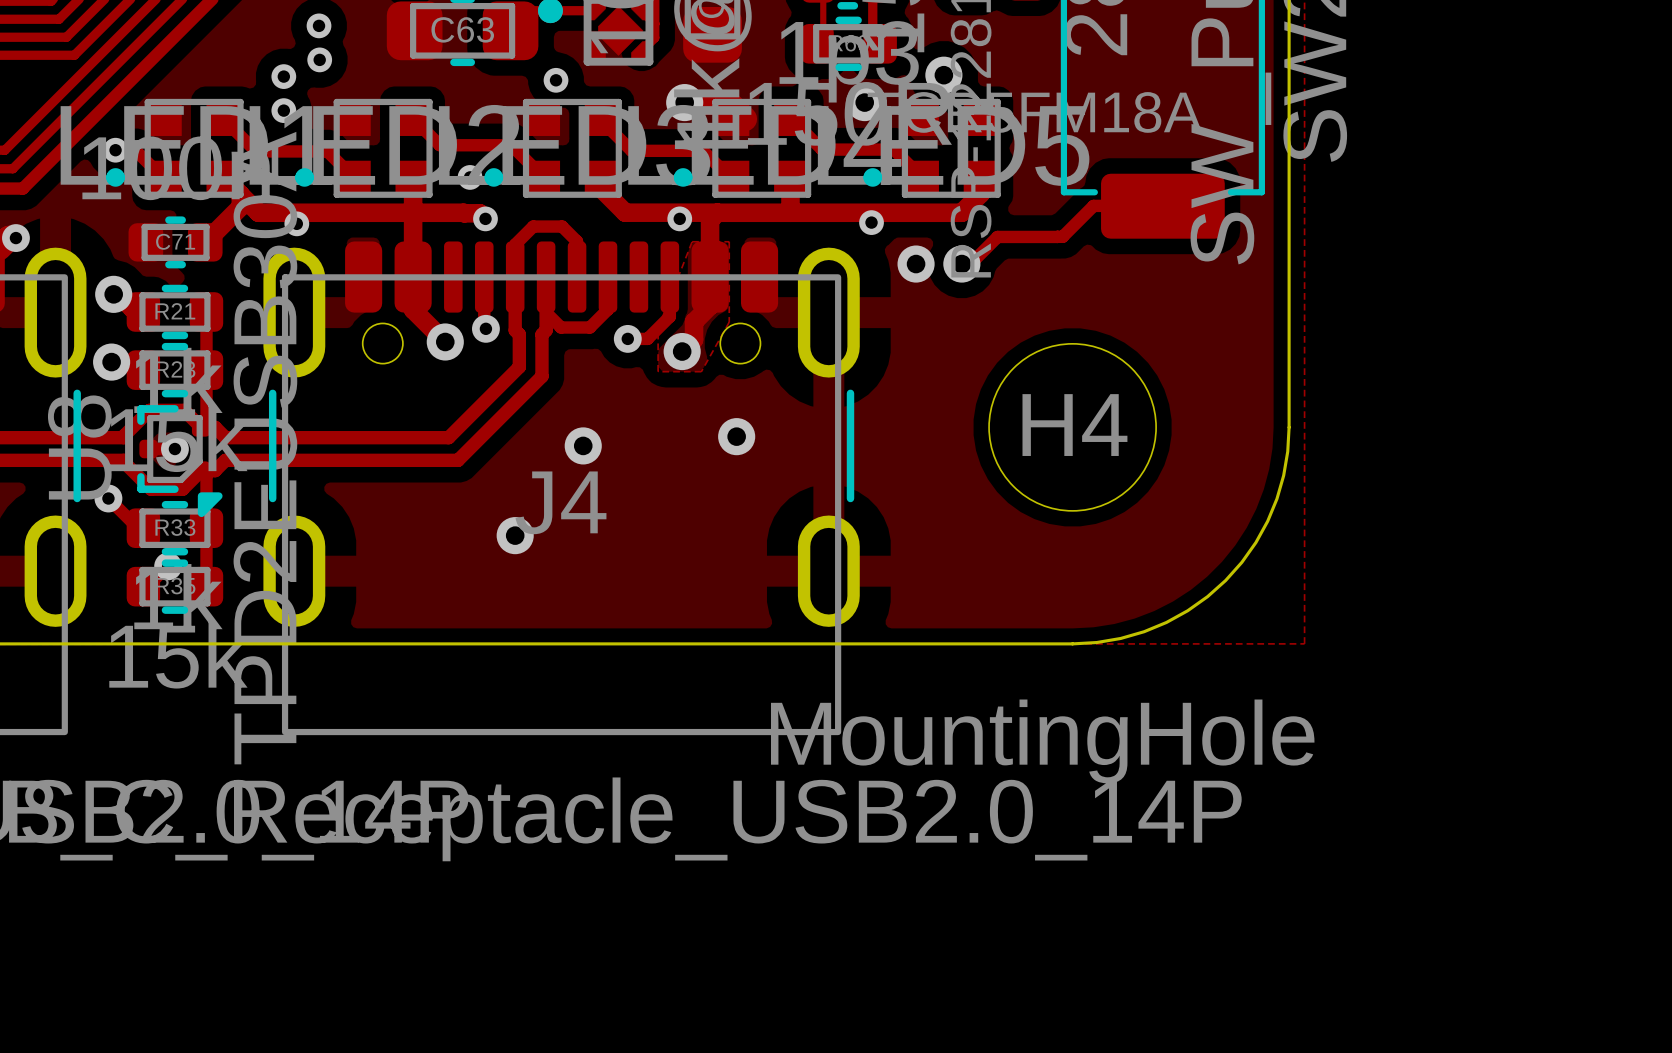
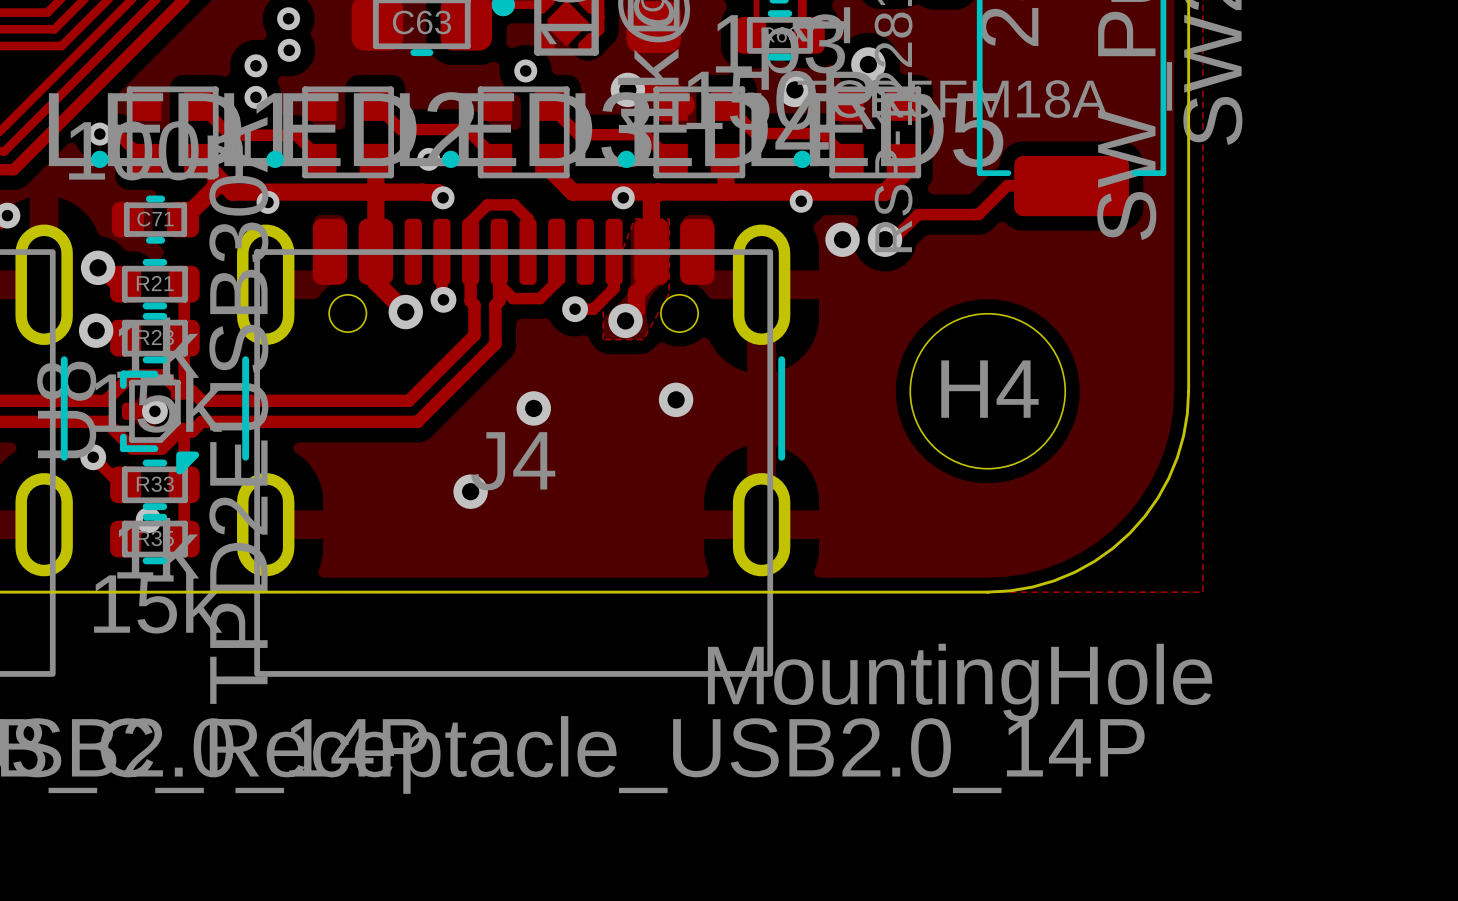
via position: (556, 80) -> (525, 70)

